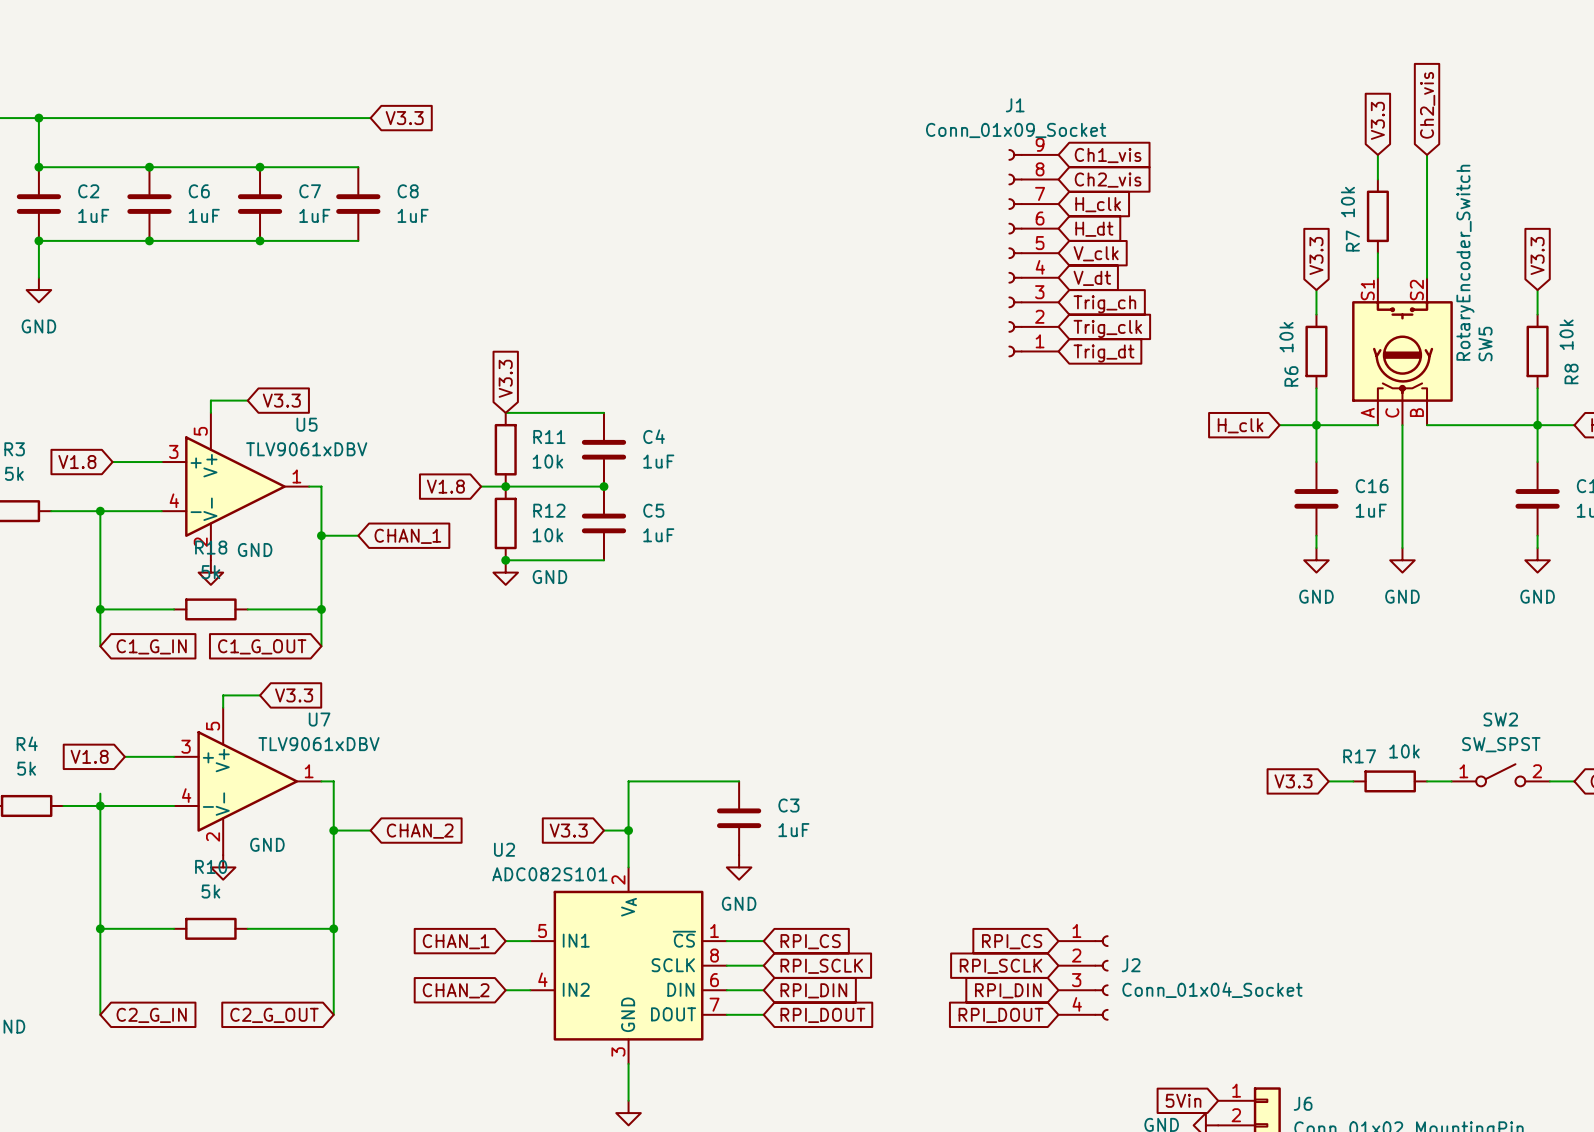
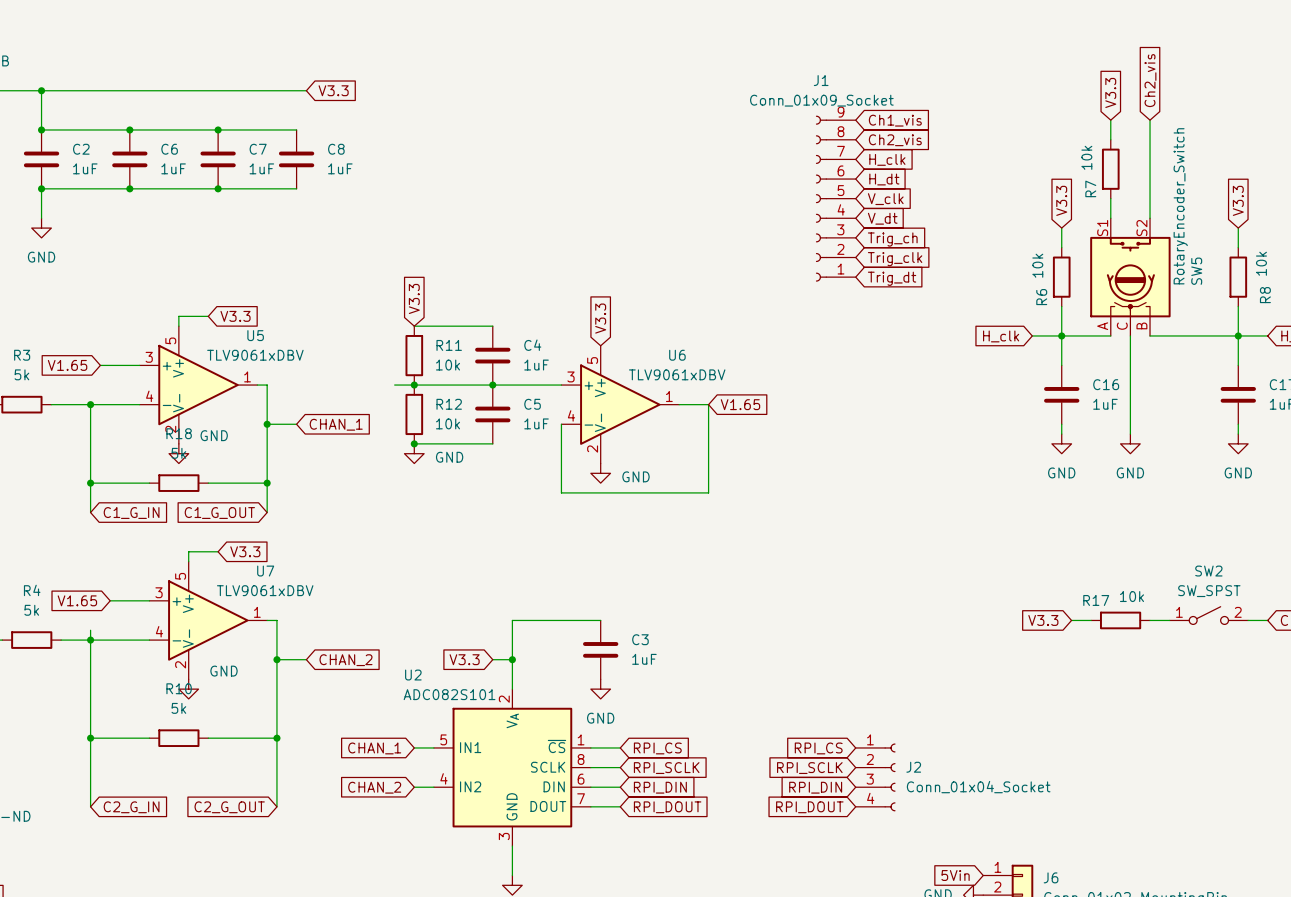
global label: none -> V3.3 (600, 318)
global label: V1.8 (77, 462) -> V1.65 (67, 365)
global label: V1.8 (445, 486) -> none
wire: none -> (492, 385) (561, 385)
U6: none -> TLV9061xDBV (620, 404)
wire: none -> (679, 404) (708, 404) (708, 492) (561, 492) (561, 424)
global label: none -> V1.65 (740, 404)
power symbol: none -> GND (600, 473)
global label: V1.8 (89, 756) -> V1.65 (77, 600)

